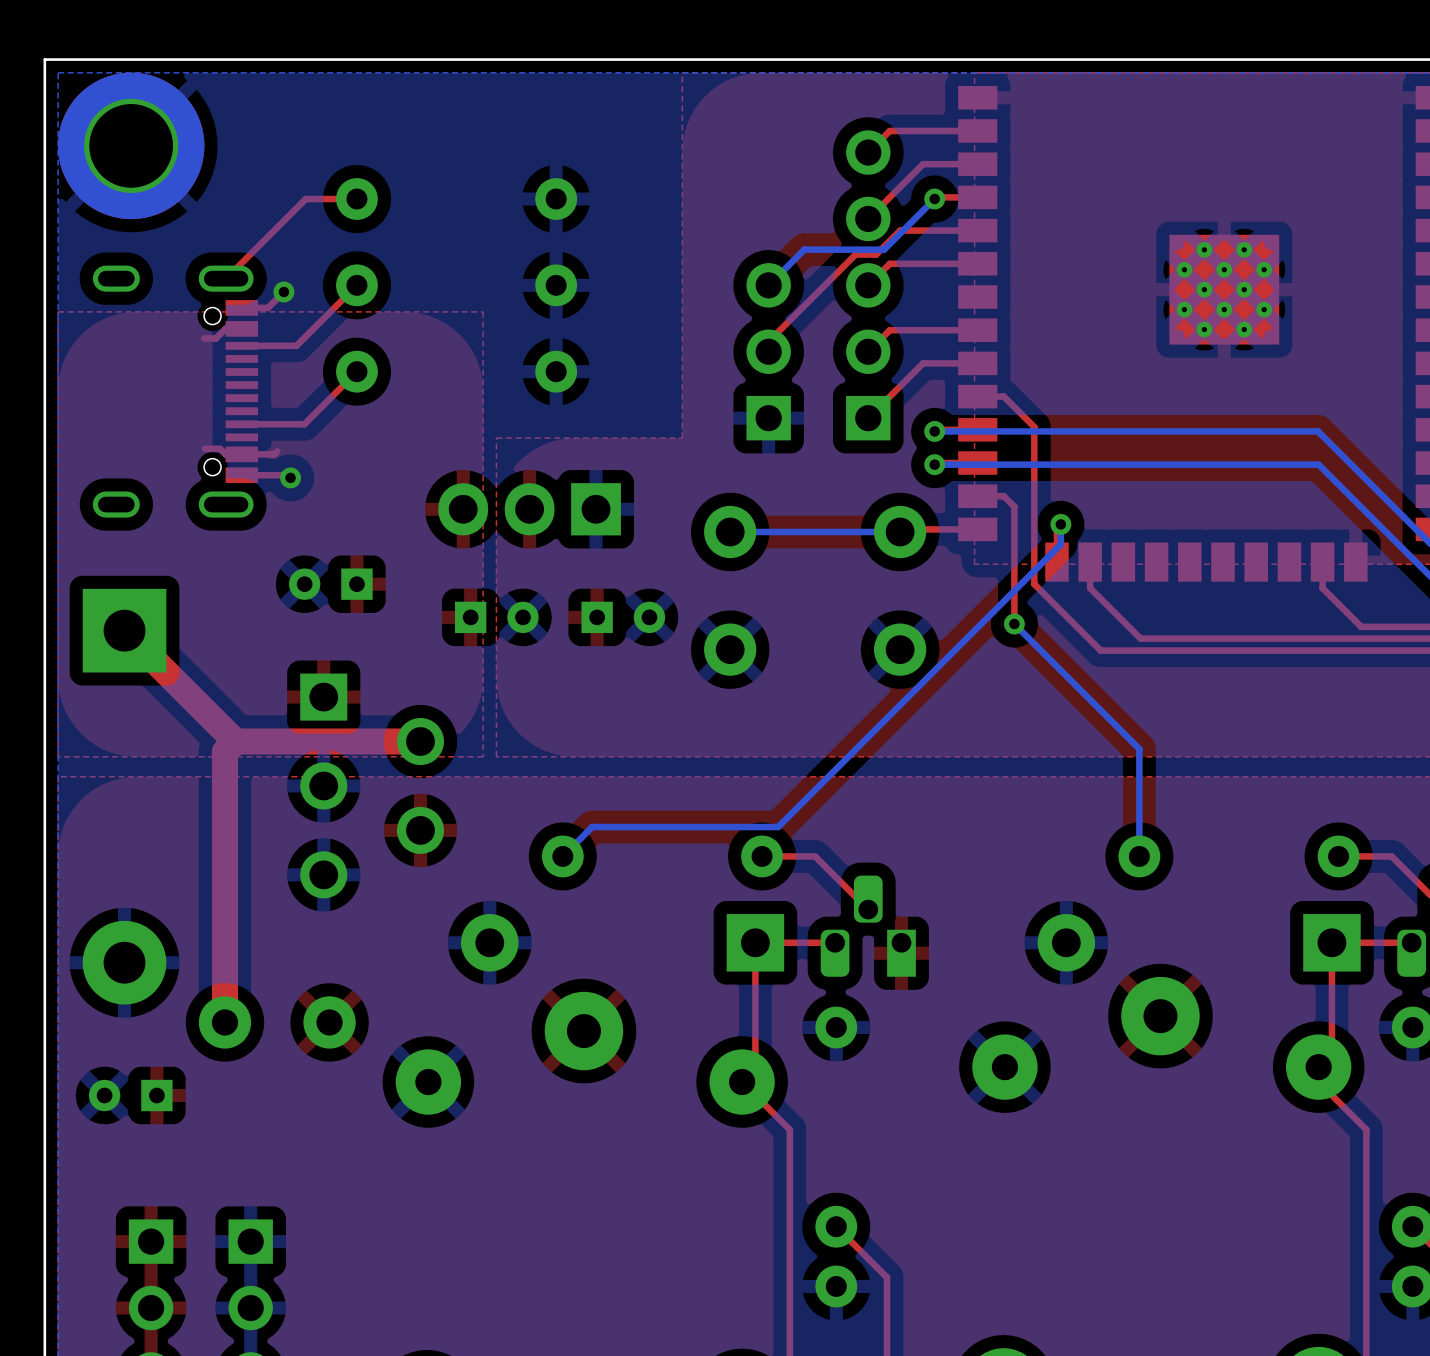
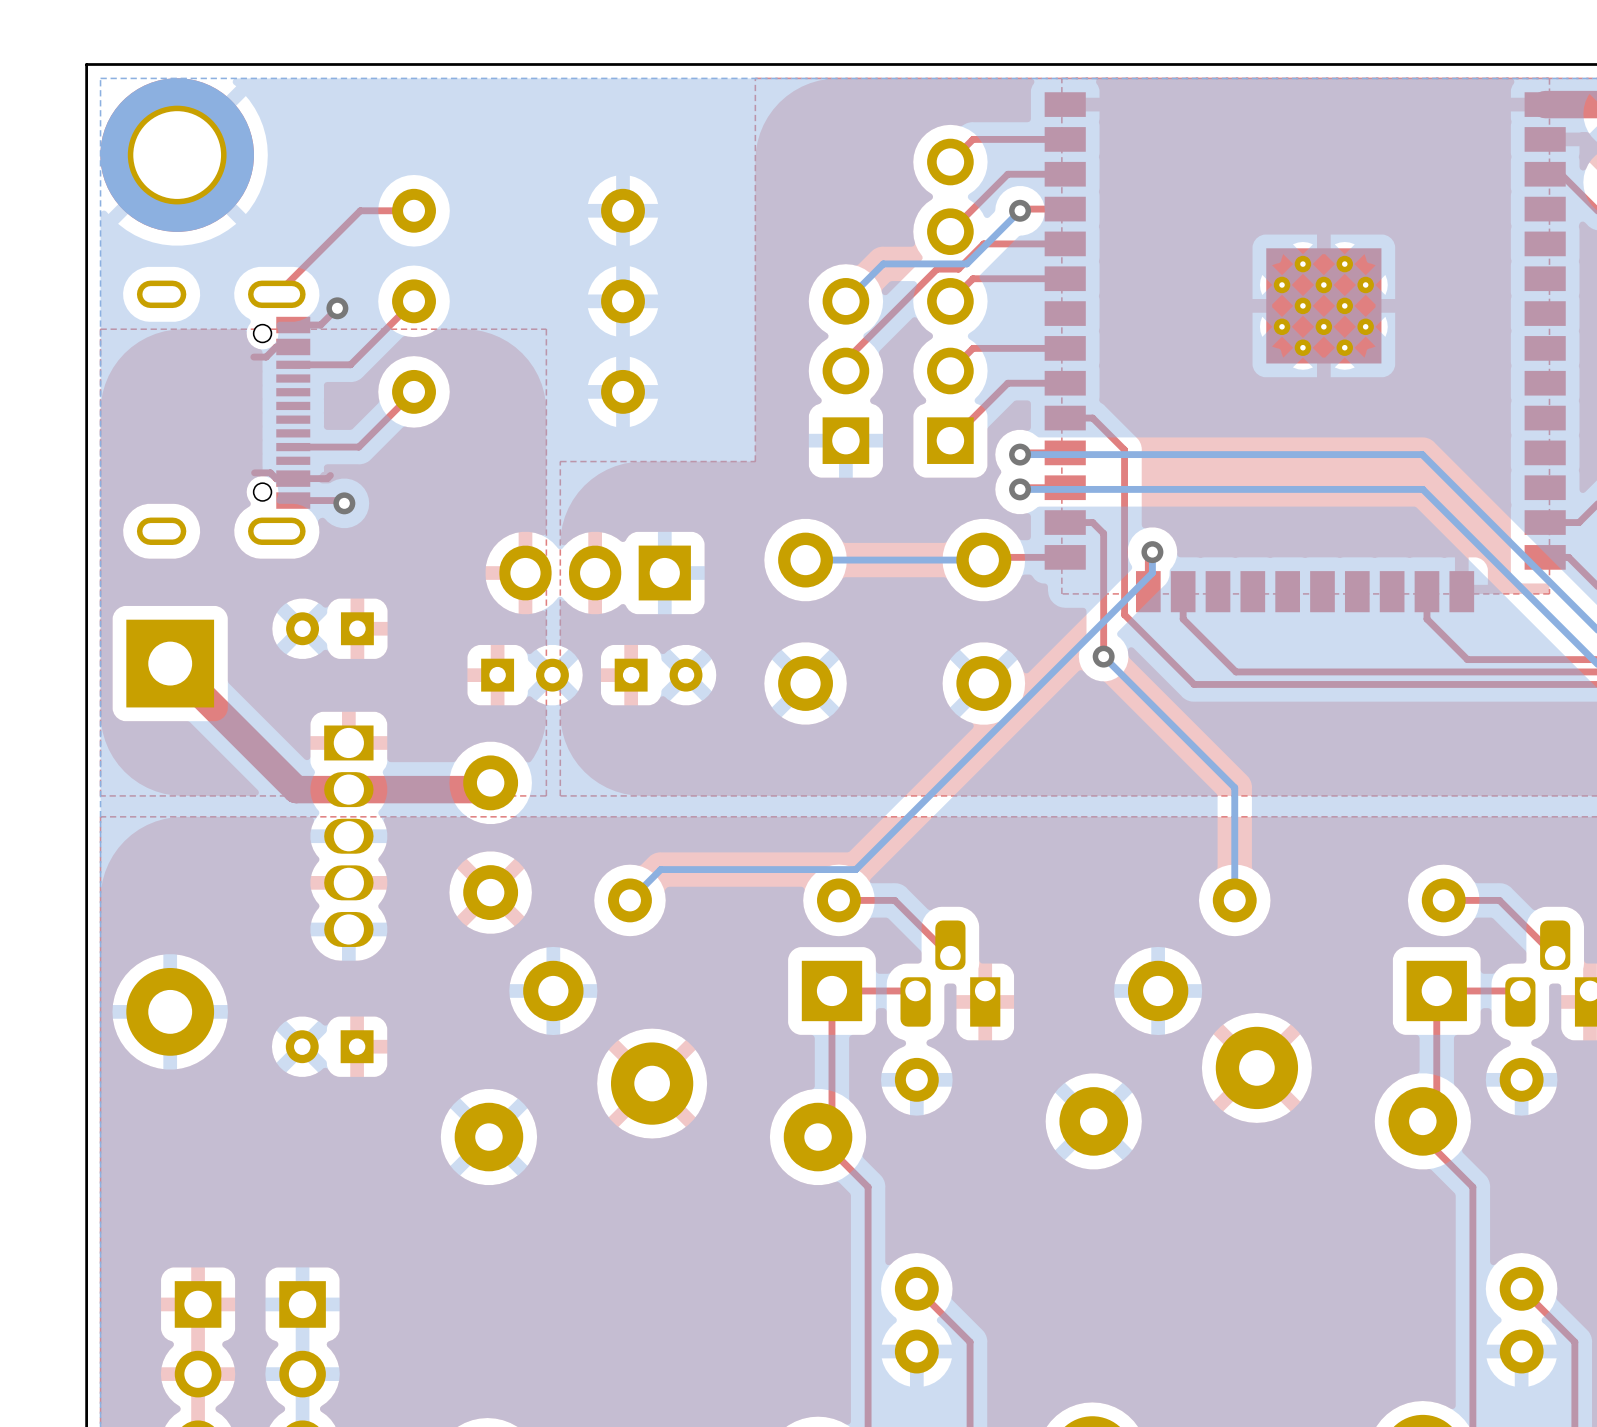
part position: (529, 509) -> (595, 573)
part position: (330, 584) -> (329, 628)
part position: (496, 617) -> (525, 675)
part position: (623, 617) -> (658, 675)
top track: none -> (286, 779) (296, 789) (483, 789)
top track: (420, 741) (235, 741) (224, 751) (224, 1022) -> none
part: (372, 785) -> none
part: none -> (348, 836)
part rotation: 0° (277, 1022) -> 90° clockwise (490, 837)
part position: (277, 1022) -> (490, 837)
part position: (130, 1095) -> (329, 1046)

